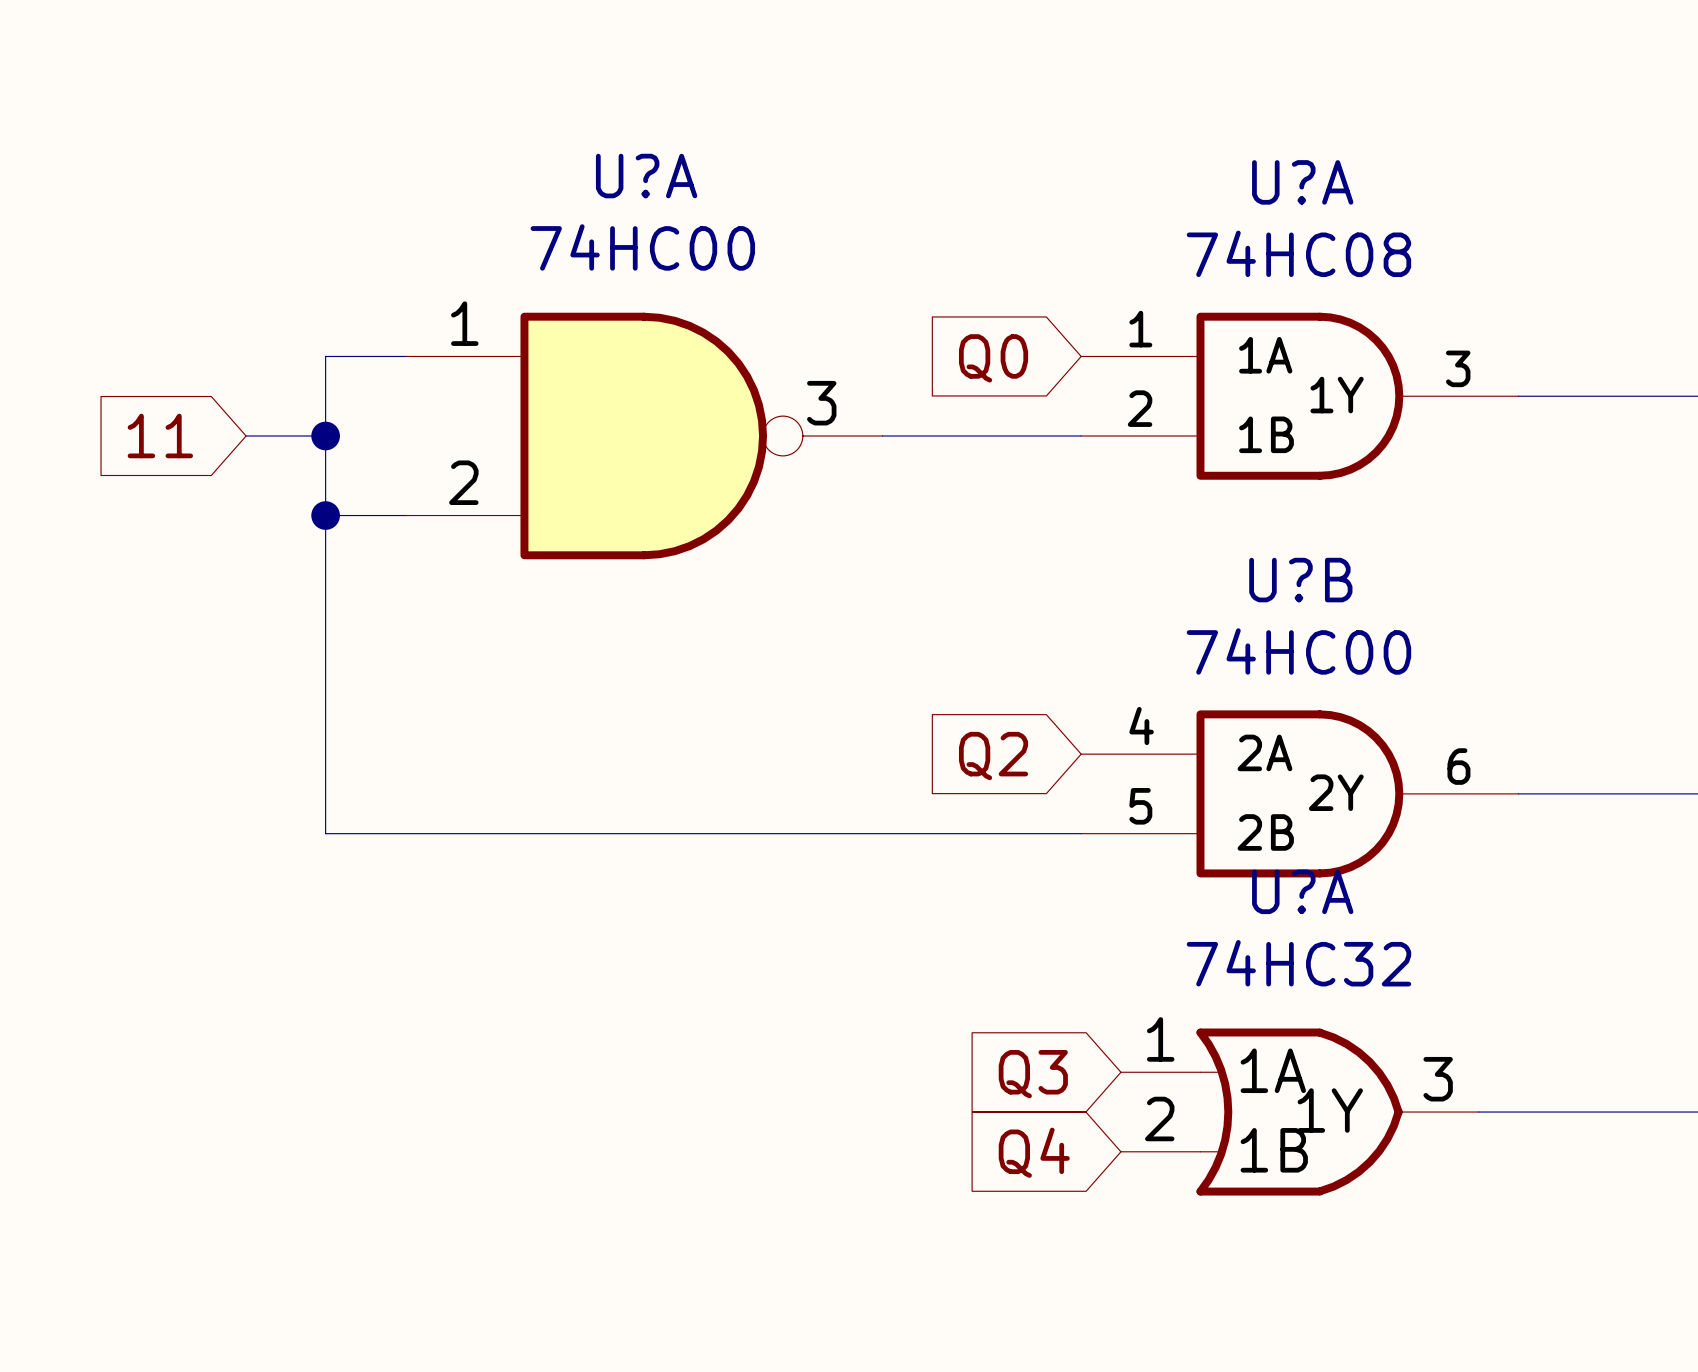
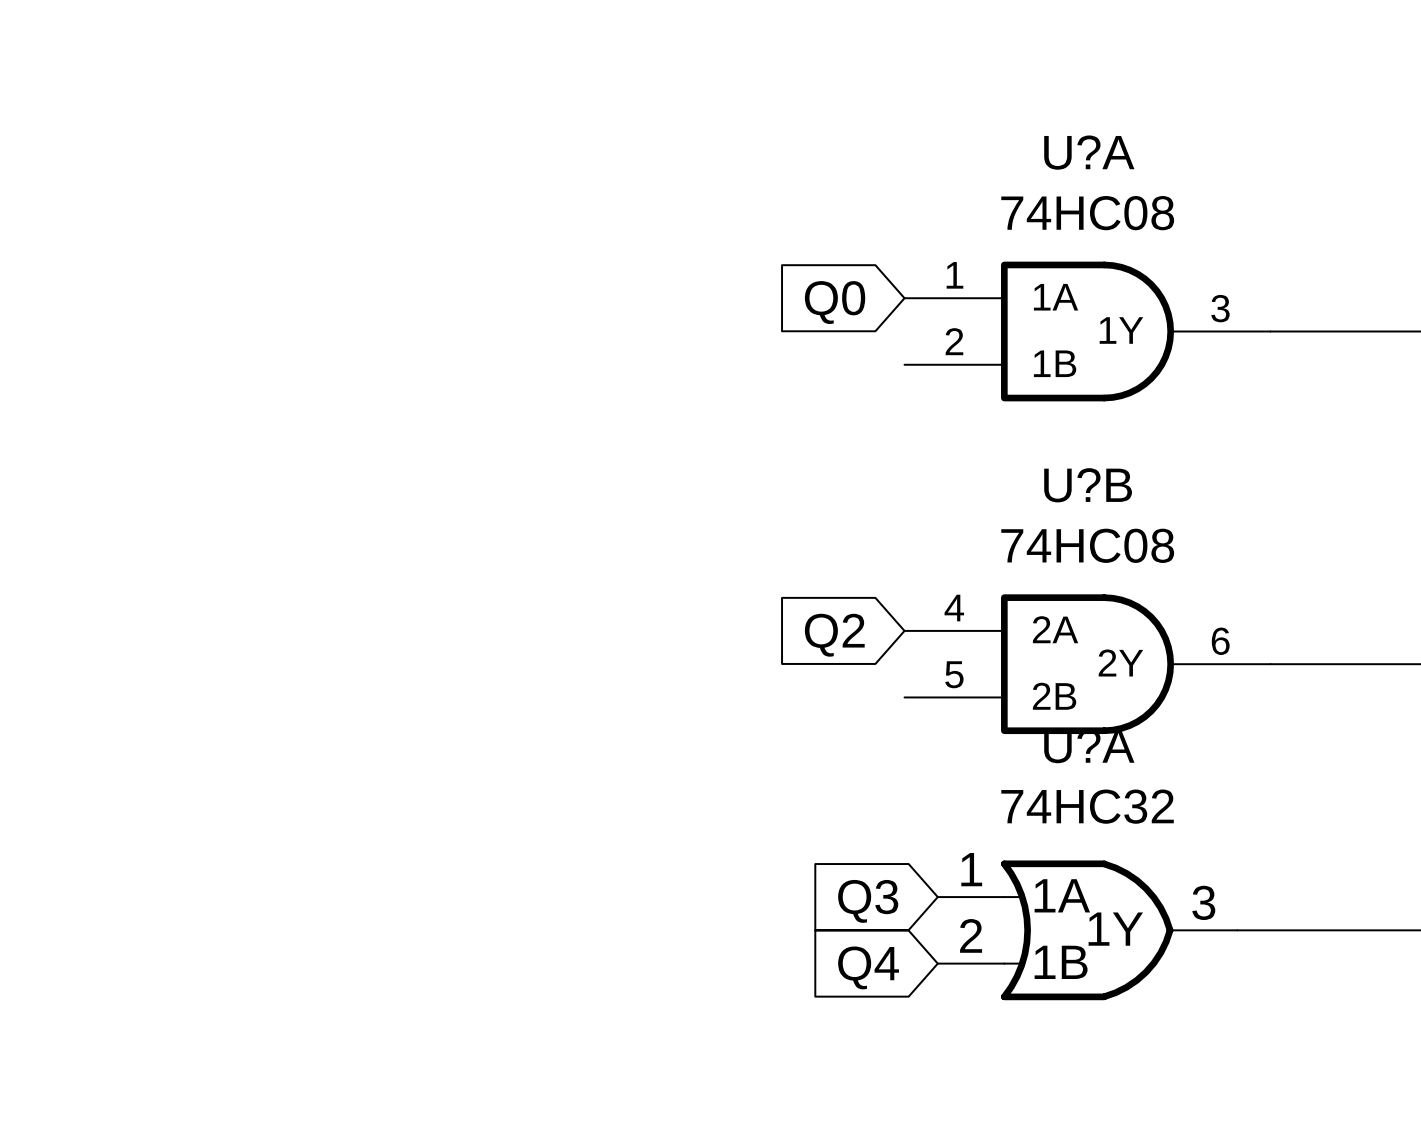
wire: (405, 356) (325, 356) (325, 833) (1081, 833) -> none
global label: 11 (160, 436) -> none
wire: (246, 436) (325, 436) -> none
junction: (325, 436) -> none
U?A: 74HC00 (643, 436) -> none
wire: (882, 436) (1081, 436) -> none
wire: (325, 515) (405, 515) -> none
junction: (325, 515) -> none
U?B value: 74HC00 (1298, 651) -> 74HC08 (1087, 545)

